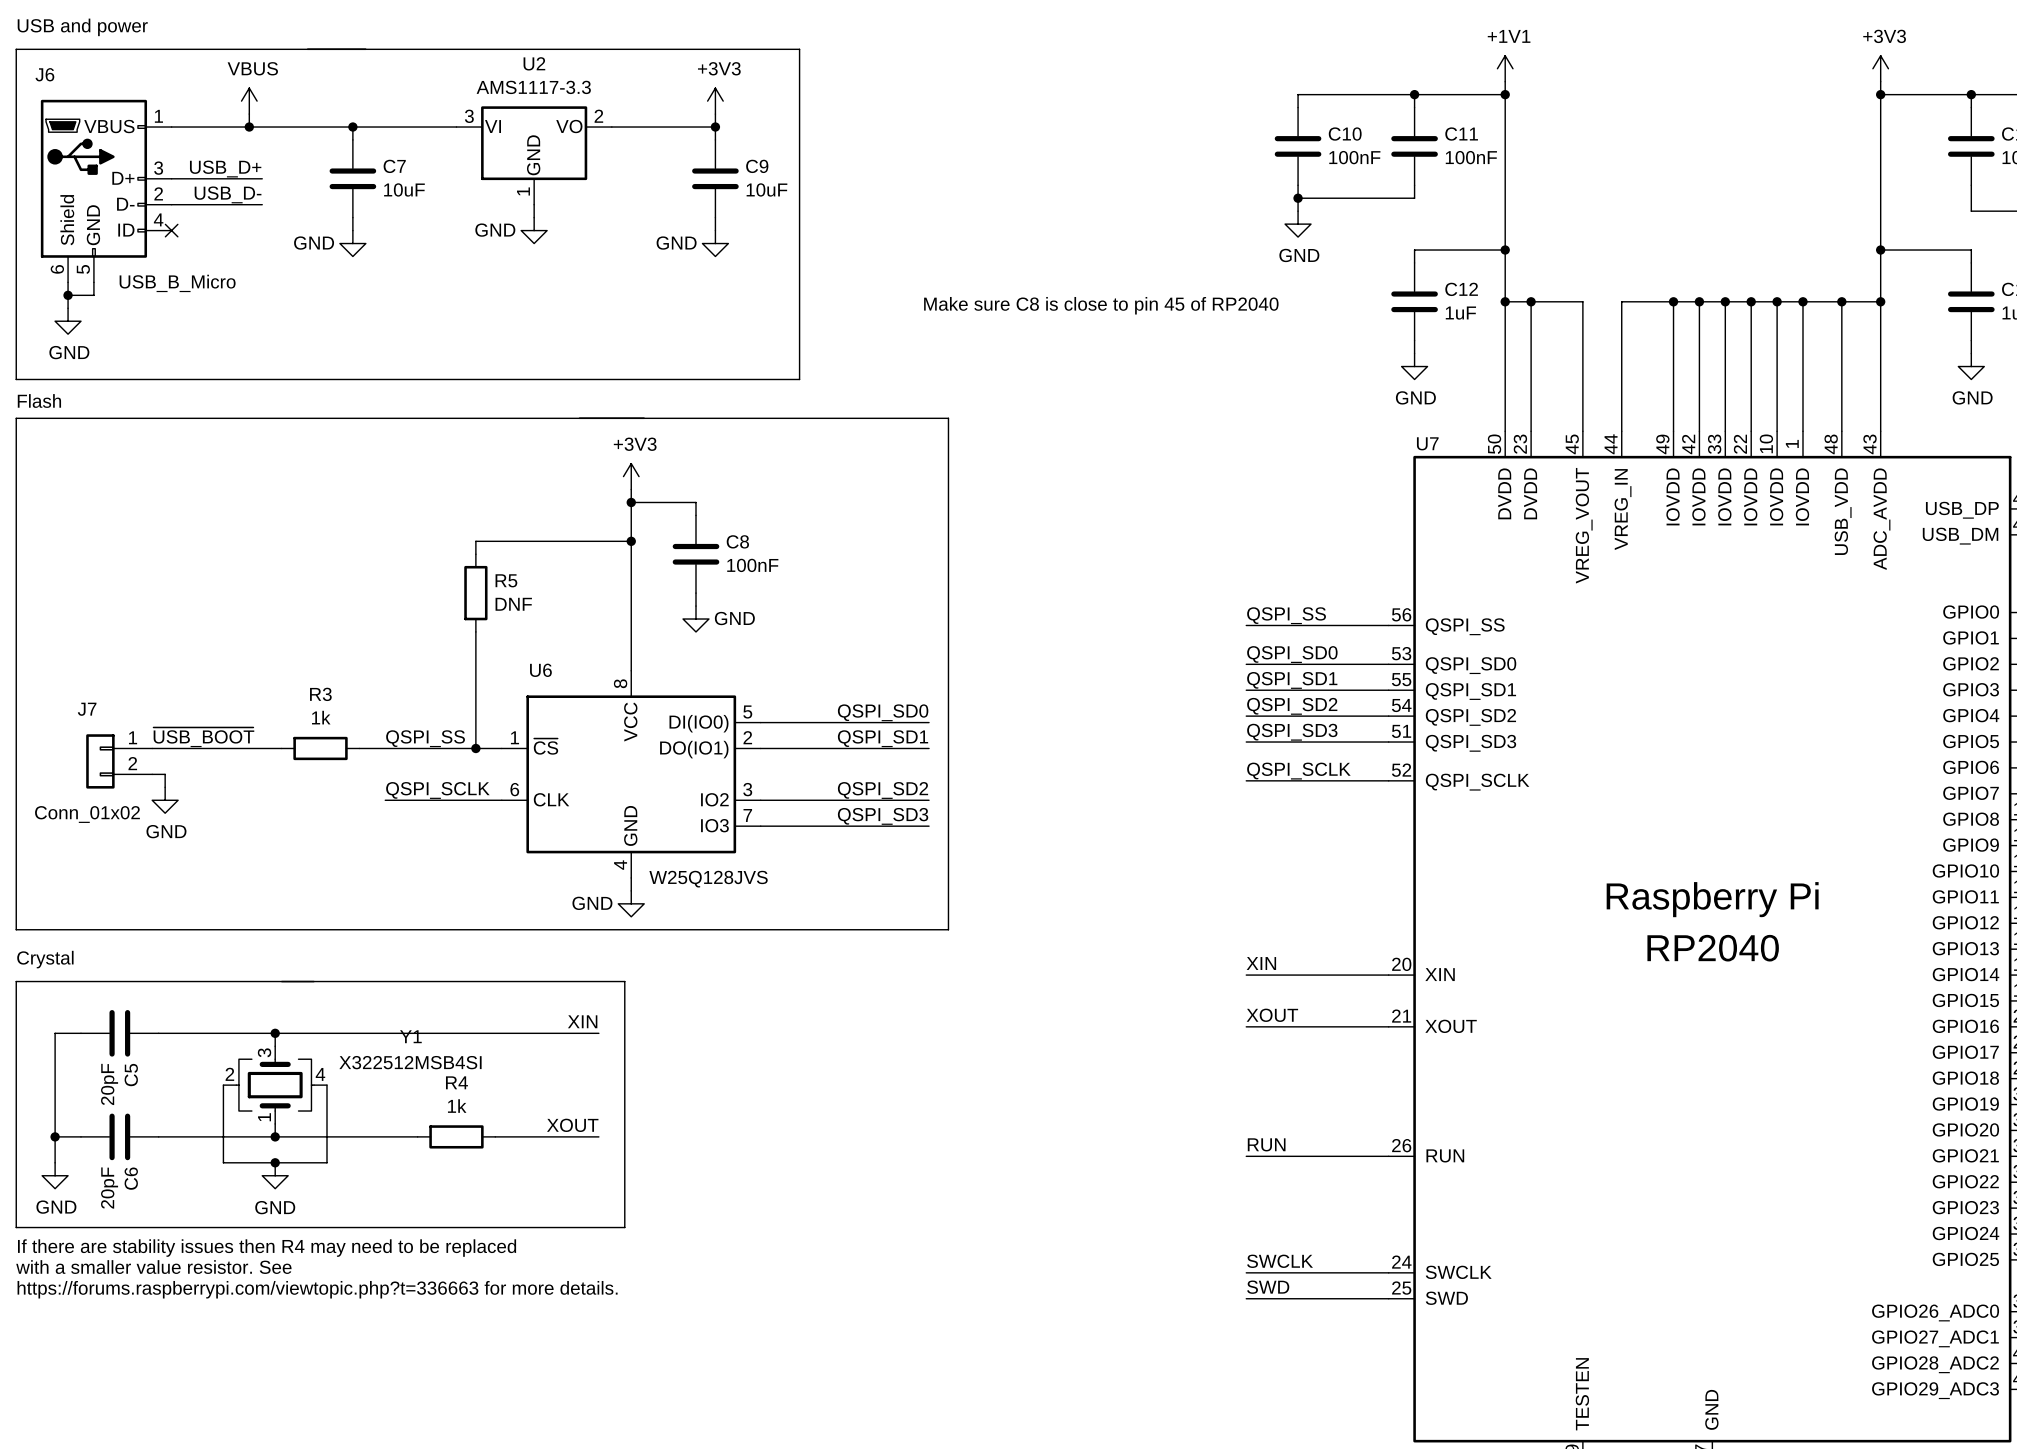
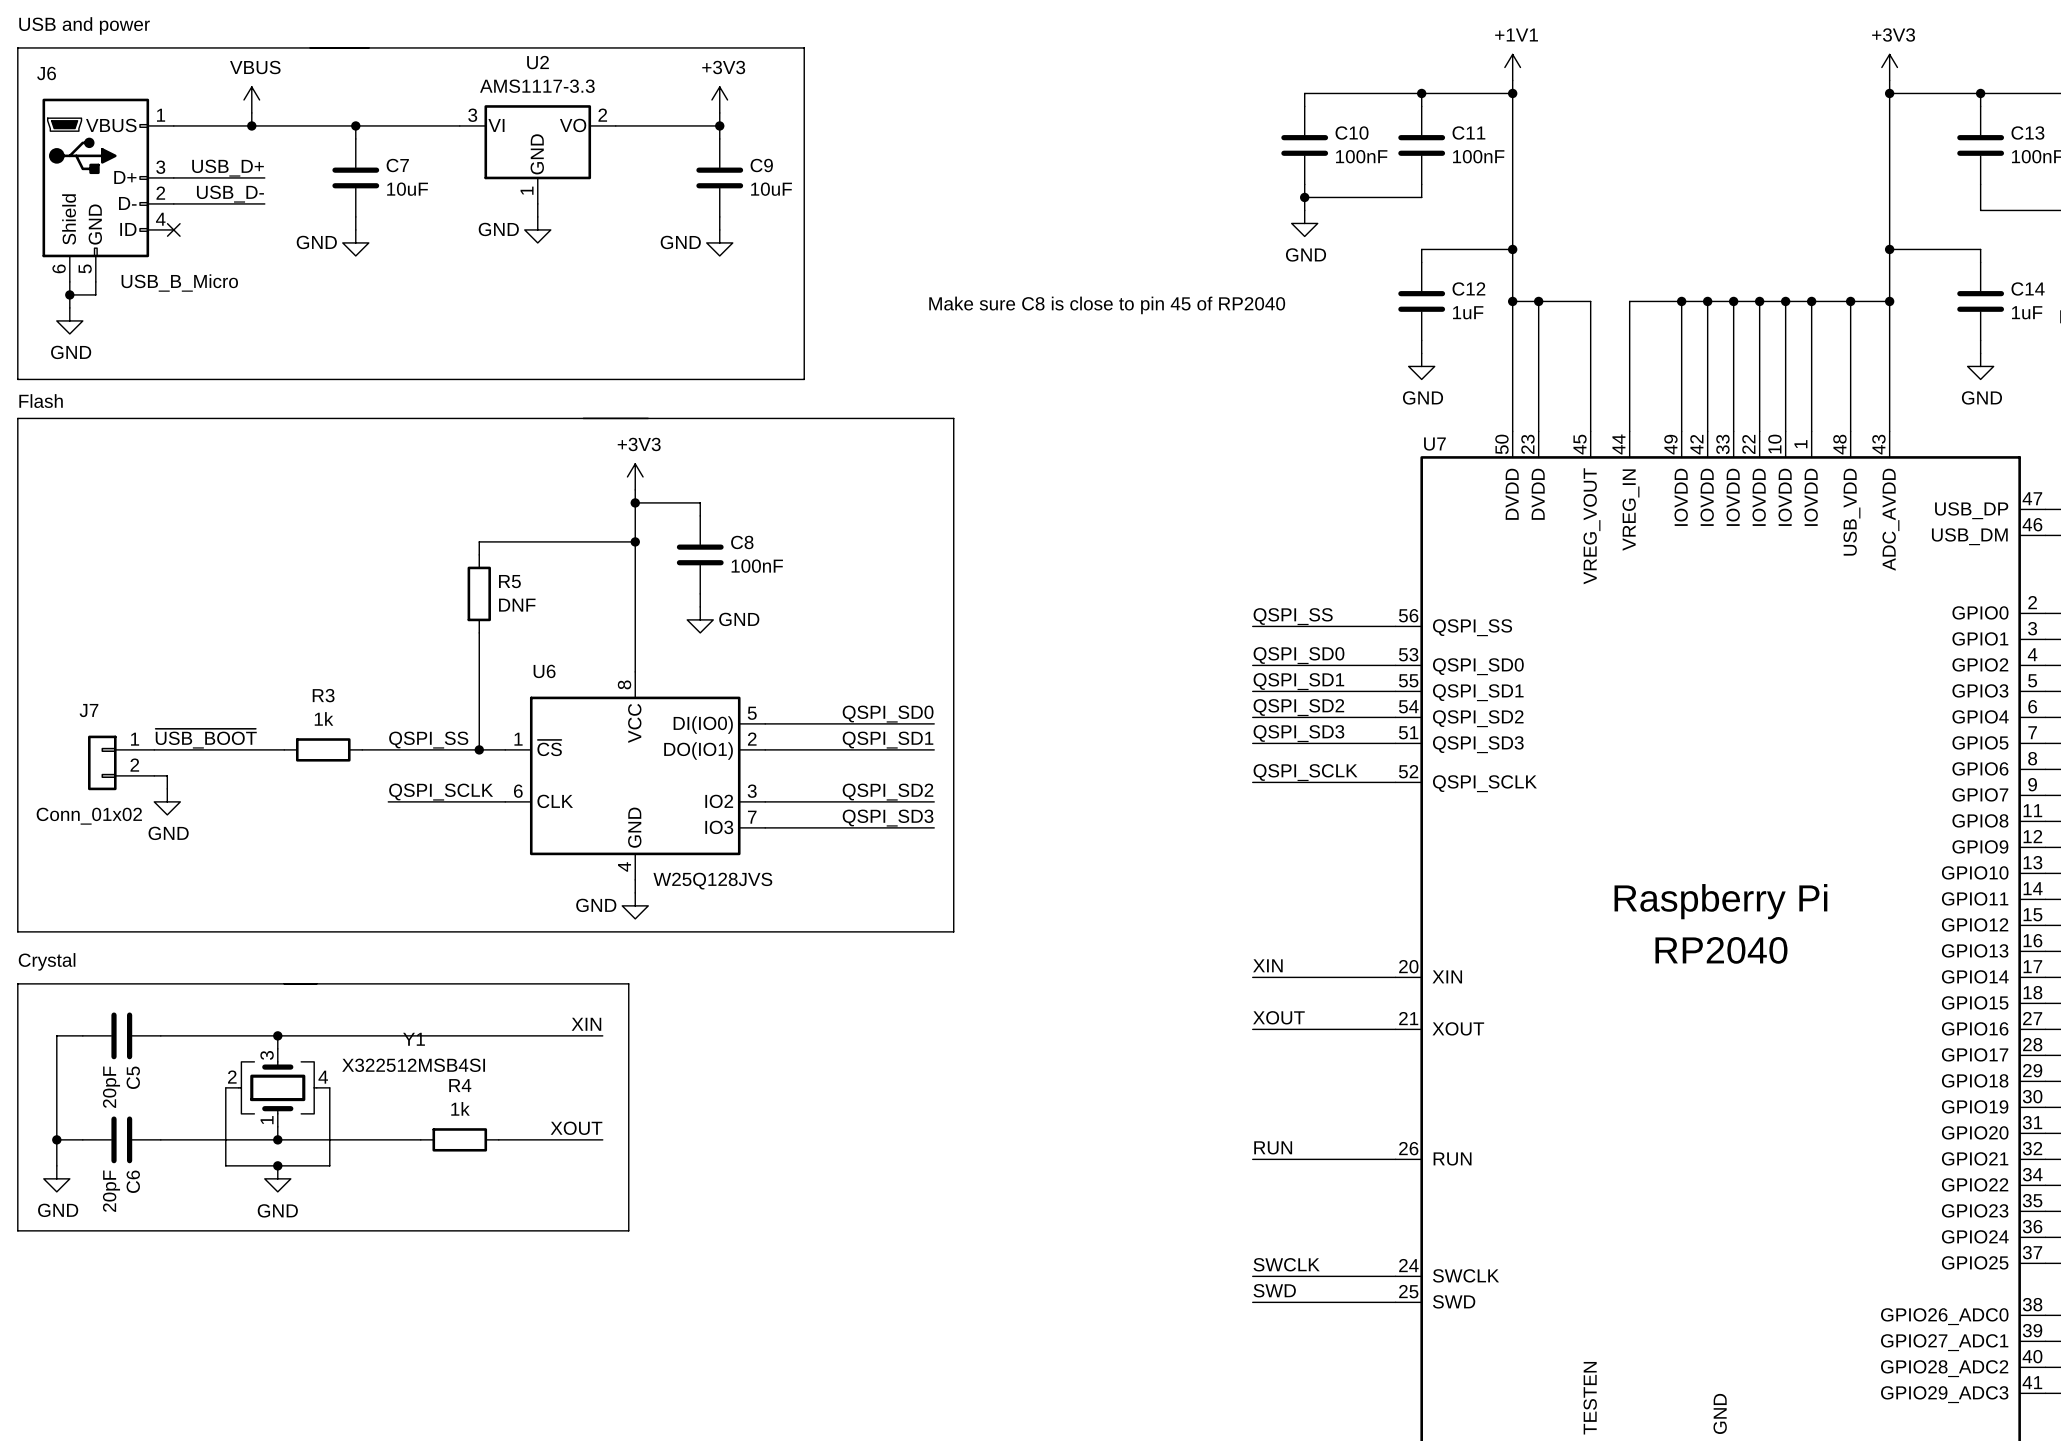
text: If there are stability issues then R4 may need to be replaced (267, 1248) -> none
text: with a smaller value resistor. See (153, 1267) -> none
text: https://forums.raspberrypi.com/viewtopic.php?t=336663 for more details. (317, 1289) -> none

